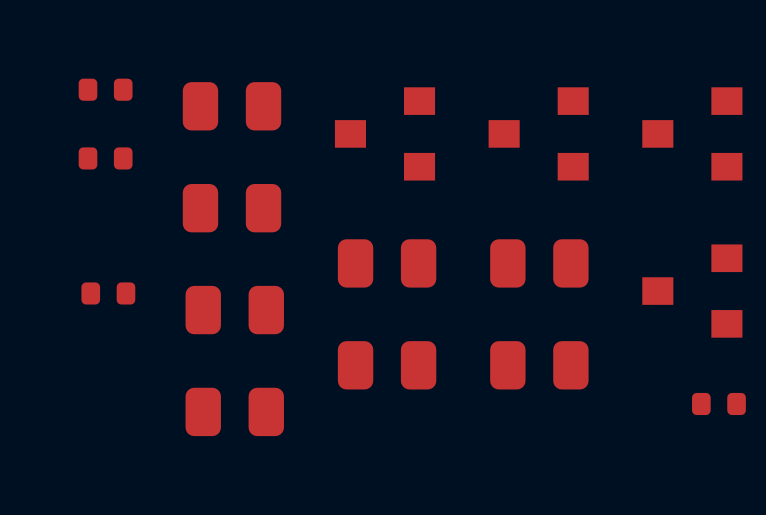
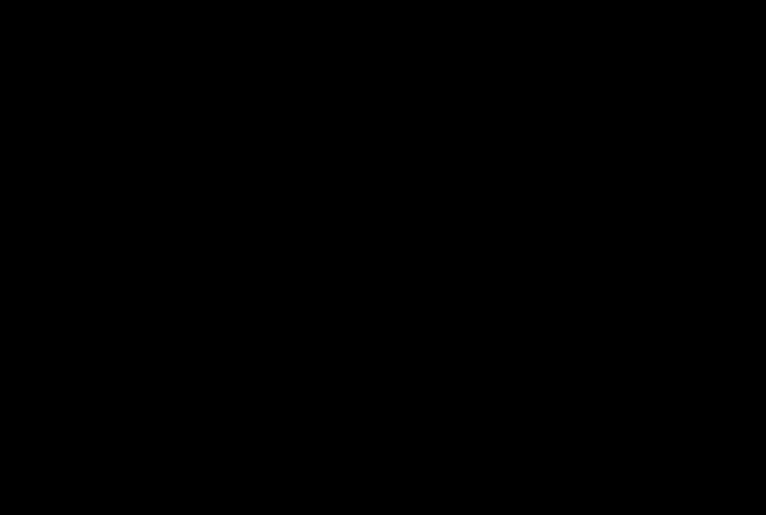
part: (105, 89) -> none
part: (232, 106) -> none
part: (384, 133) -> none
part: (538, 133) -> none
part: (692, 133) -> none
part: (105, 158) -> none
part: (232, 208) -> none
part: (387, 263) -> none
part: (539, 263) -> none
part: (692, 291) -> none
part: (108, 293) -> none
part: (234, 310) -> none
part: (387, 365) -> none
part: (539, 365) -> none
part: (718, 403) -> none
part: (234, 411) -> none

